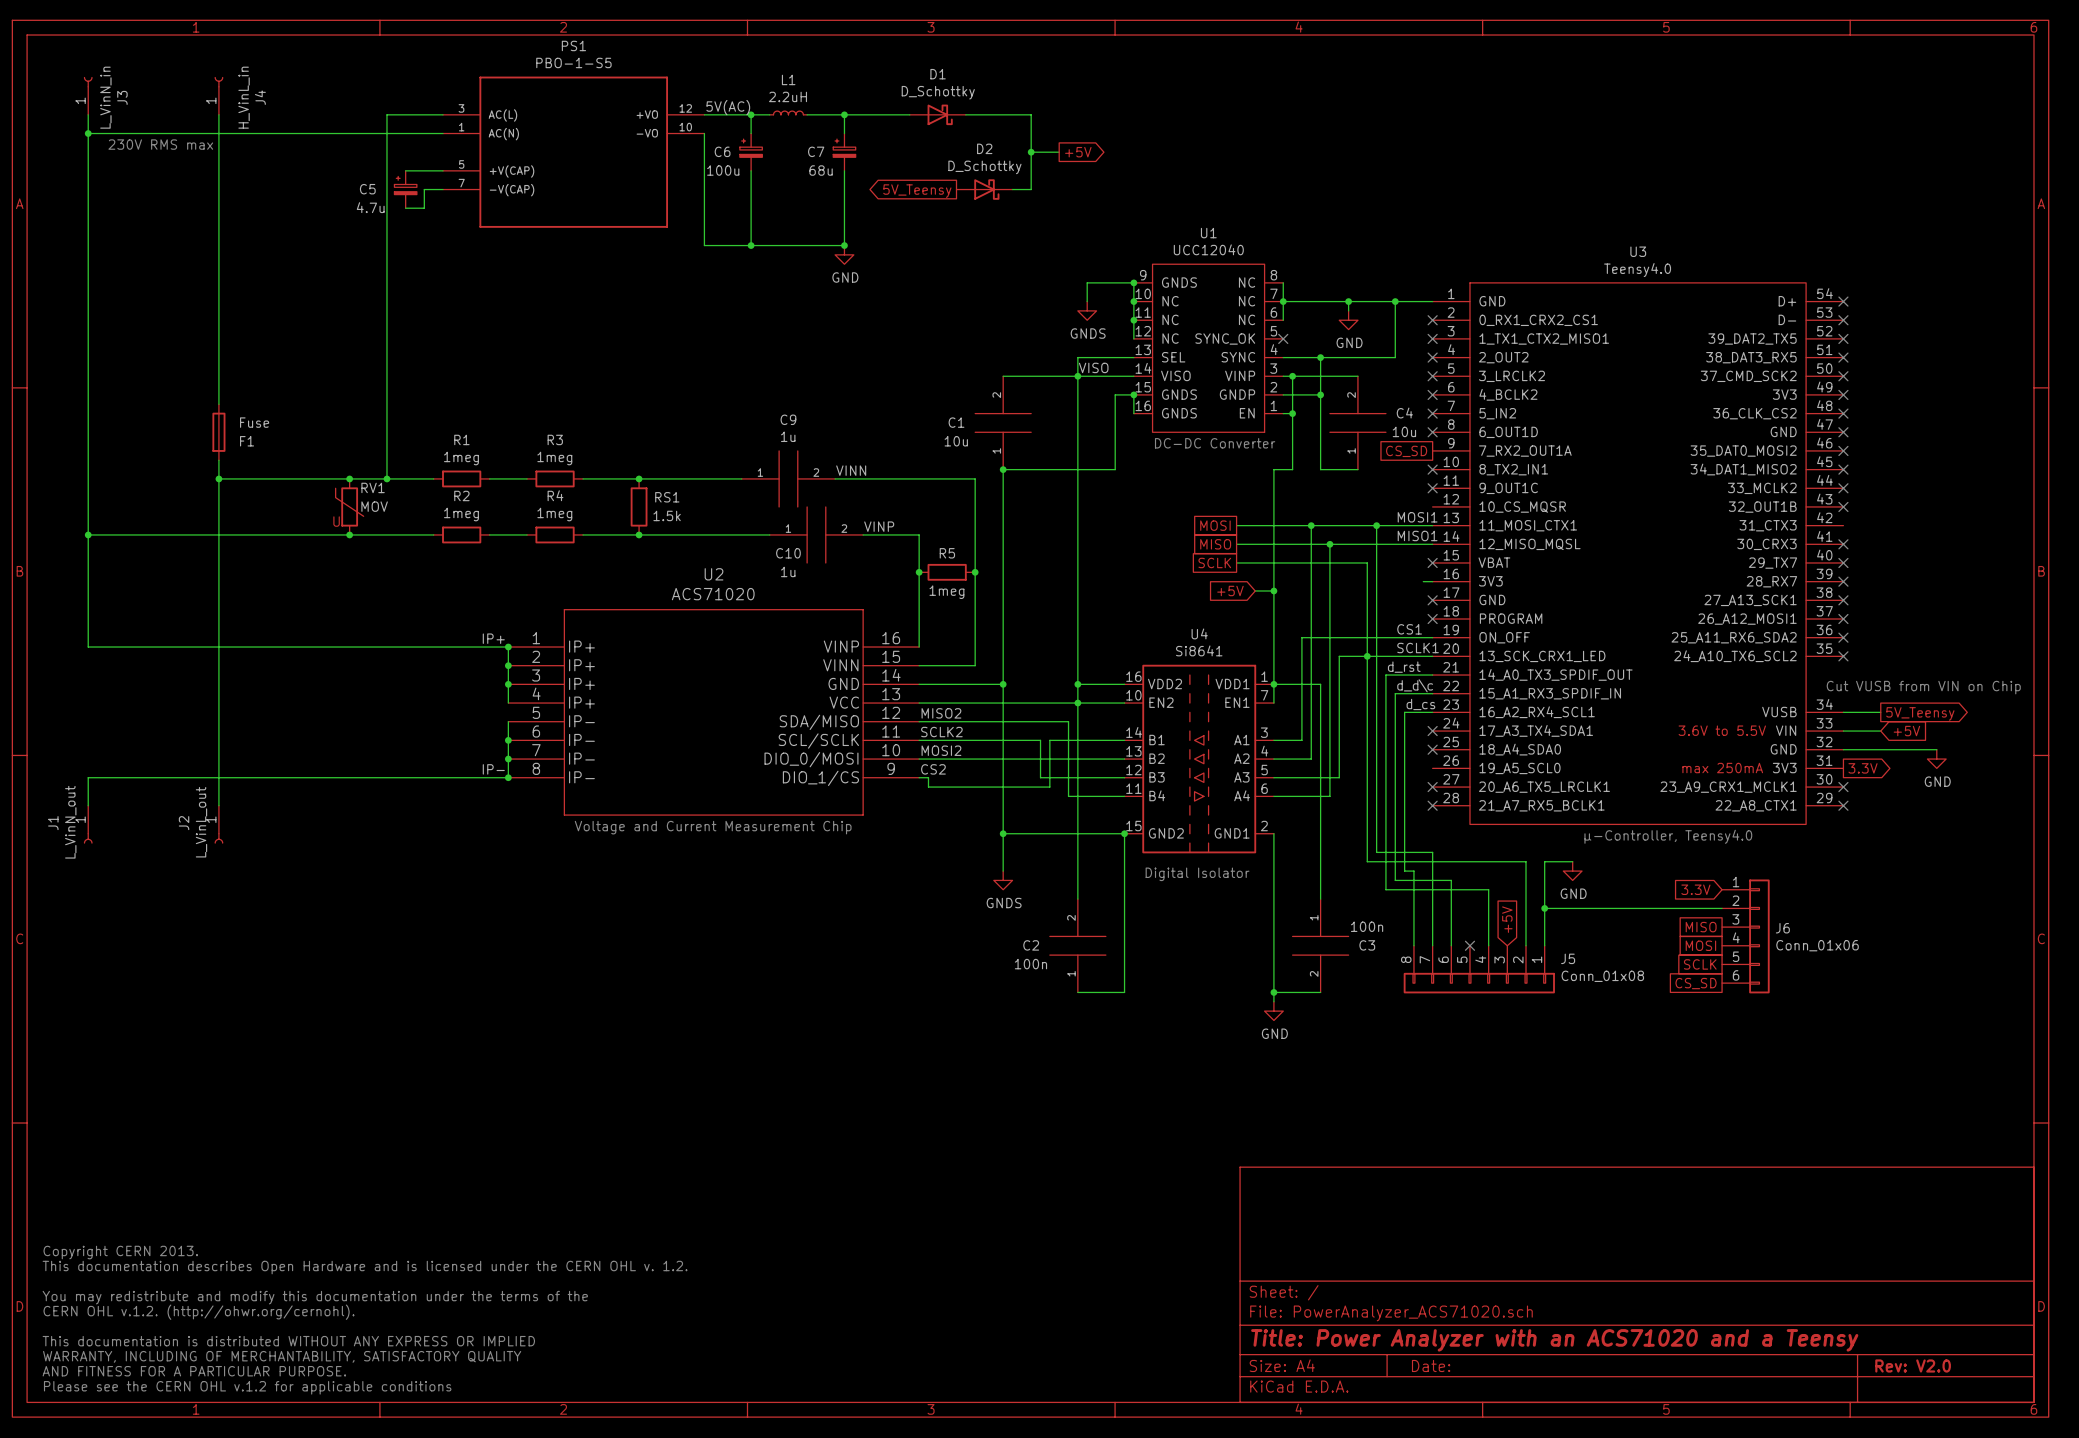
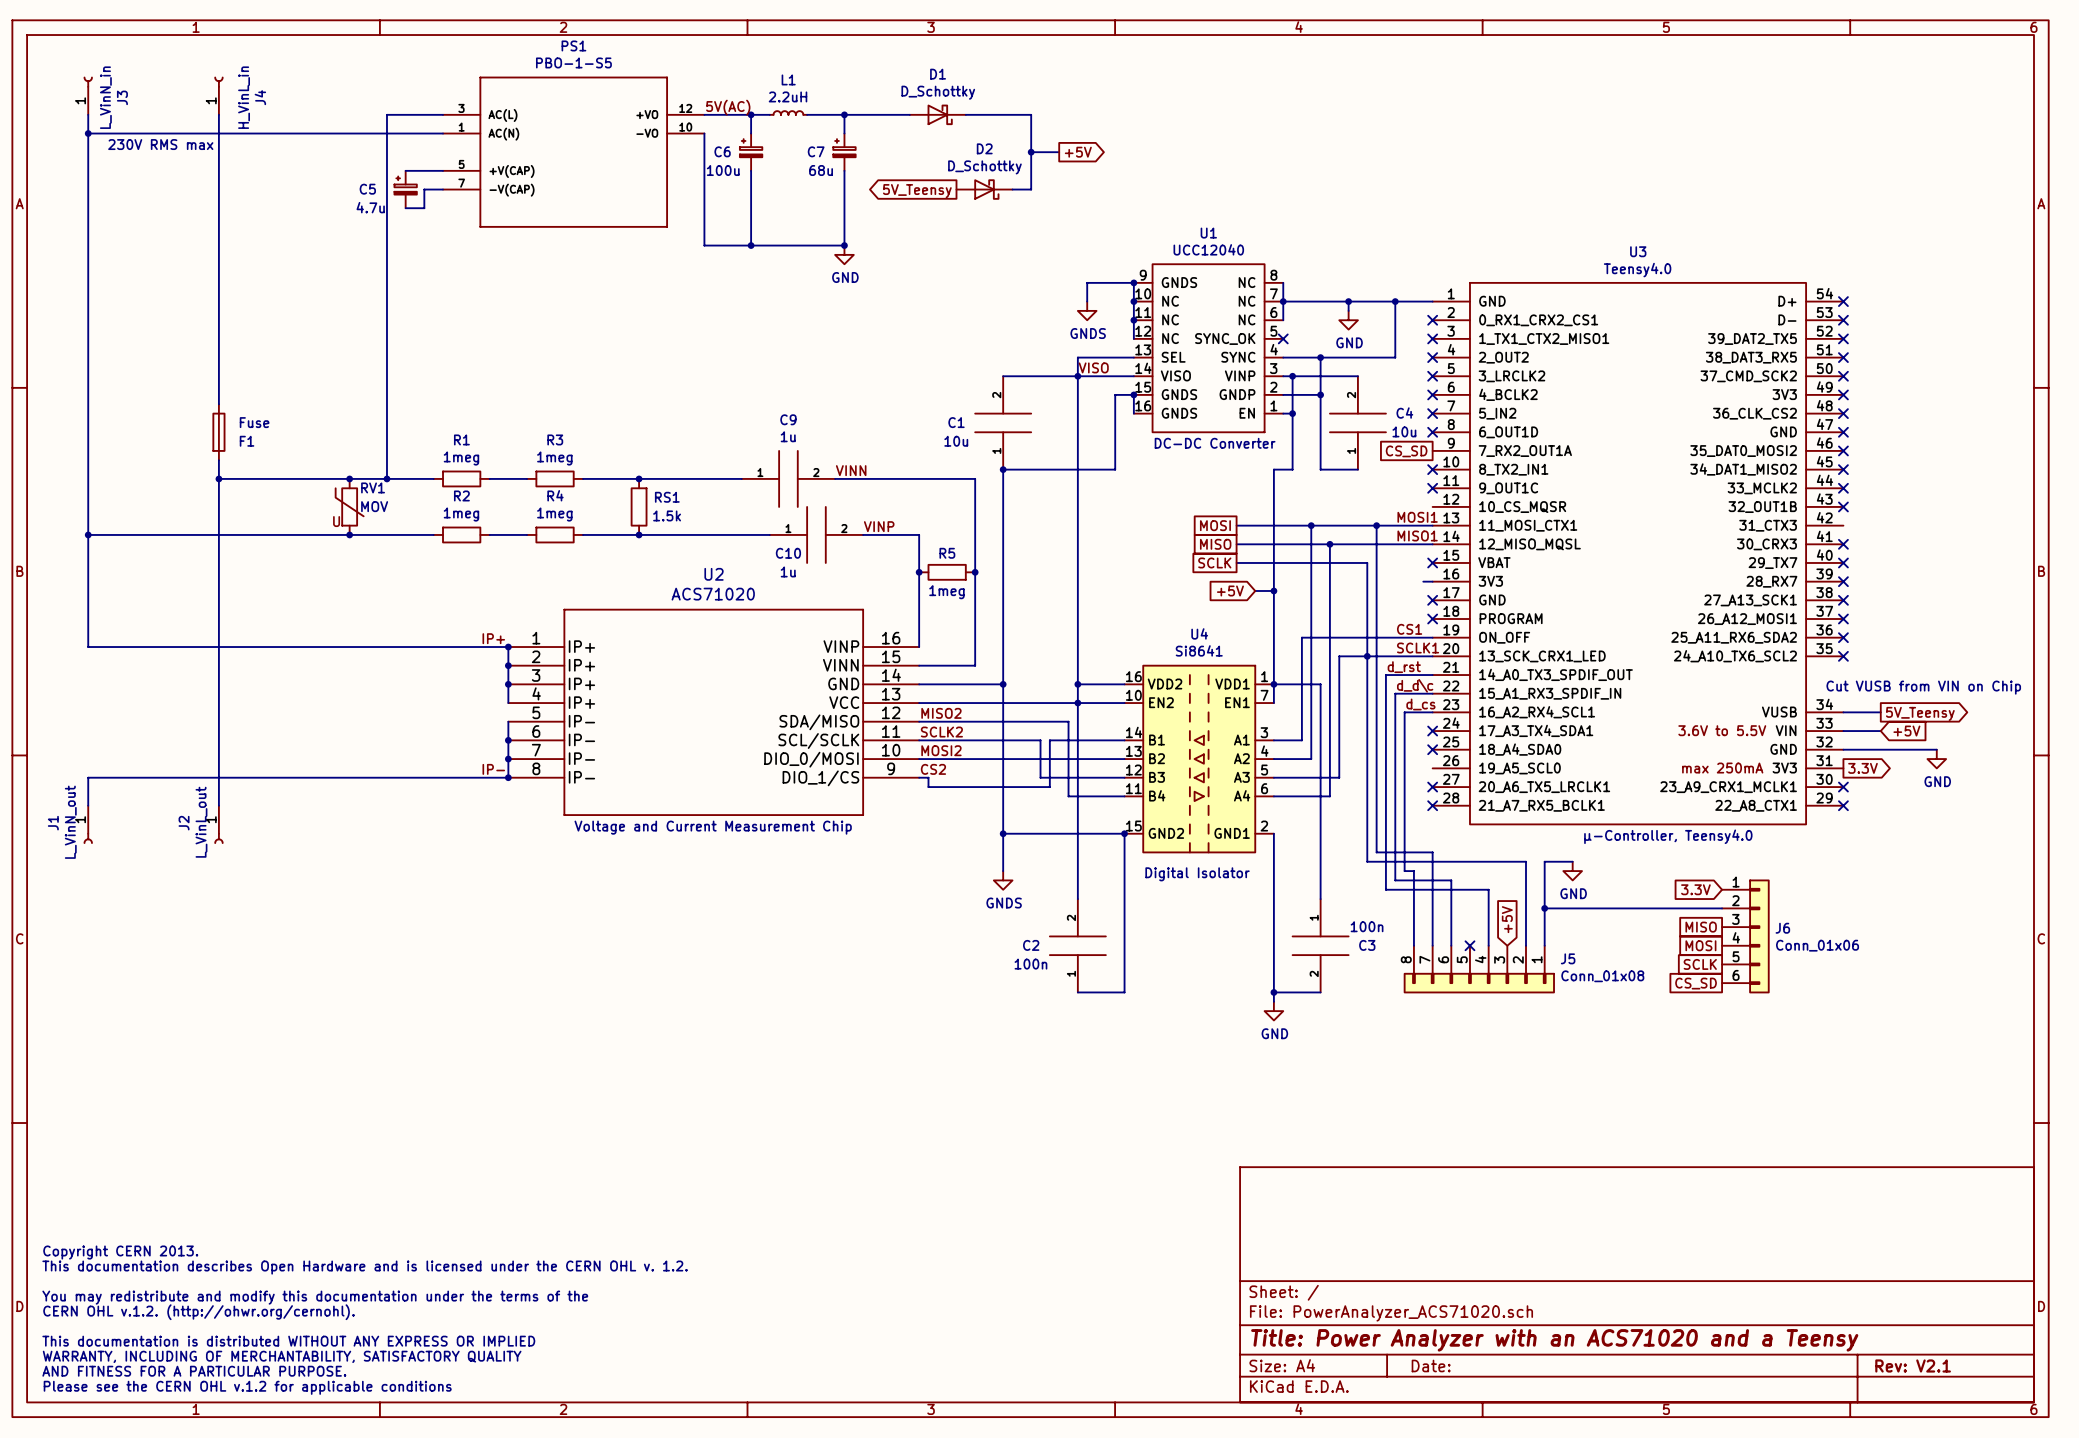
title block: Rev: V2.0 (1913, 1365) -> Rev: V2.1 (1913, 1365)

